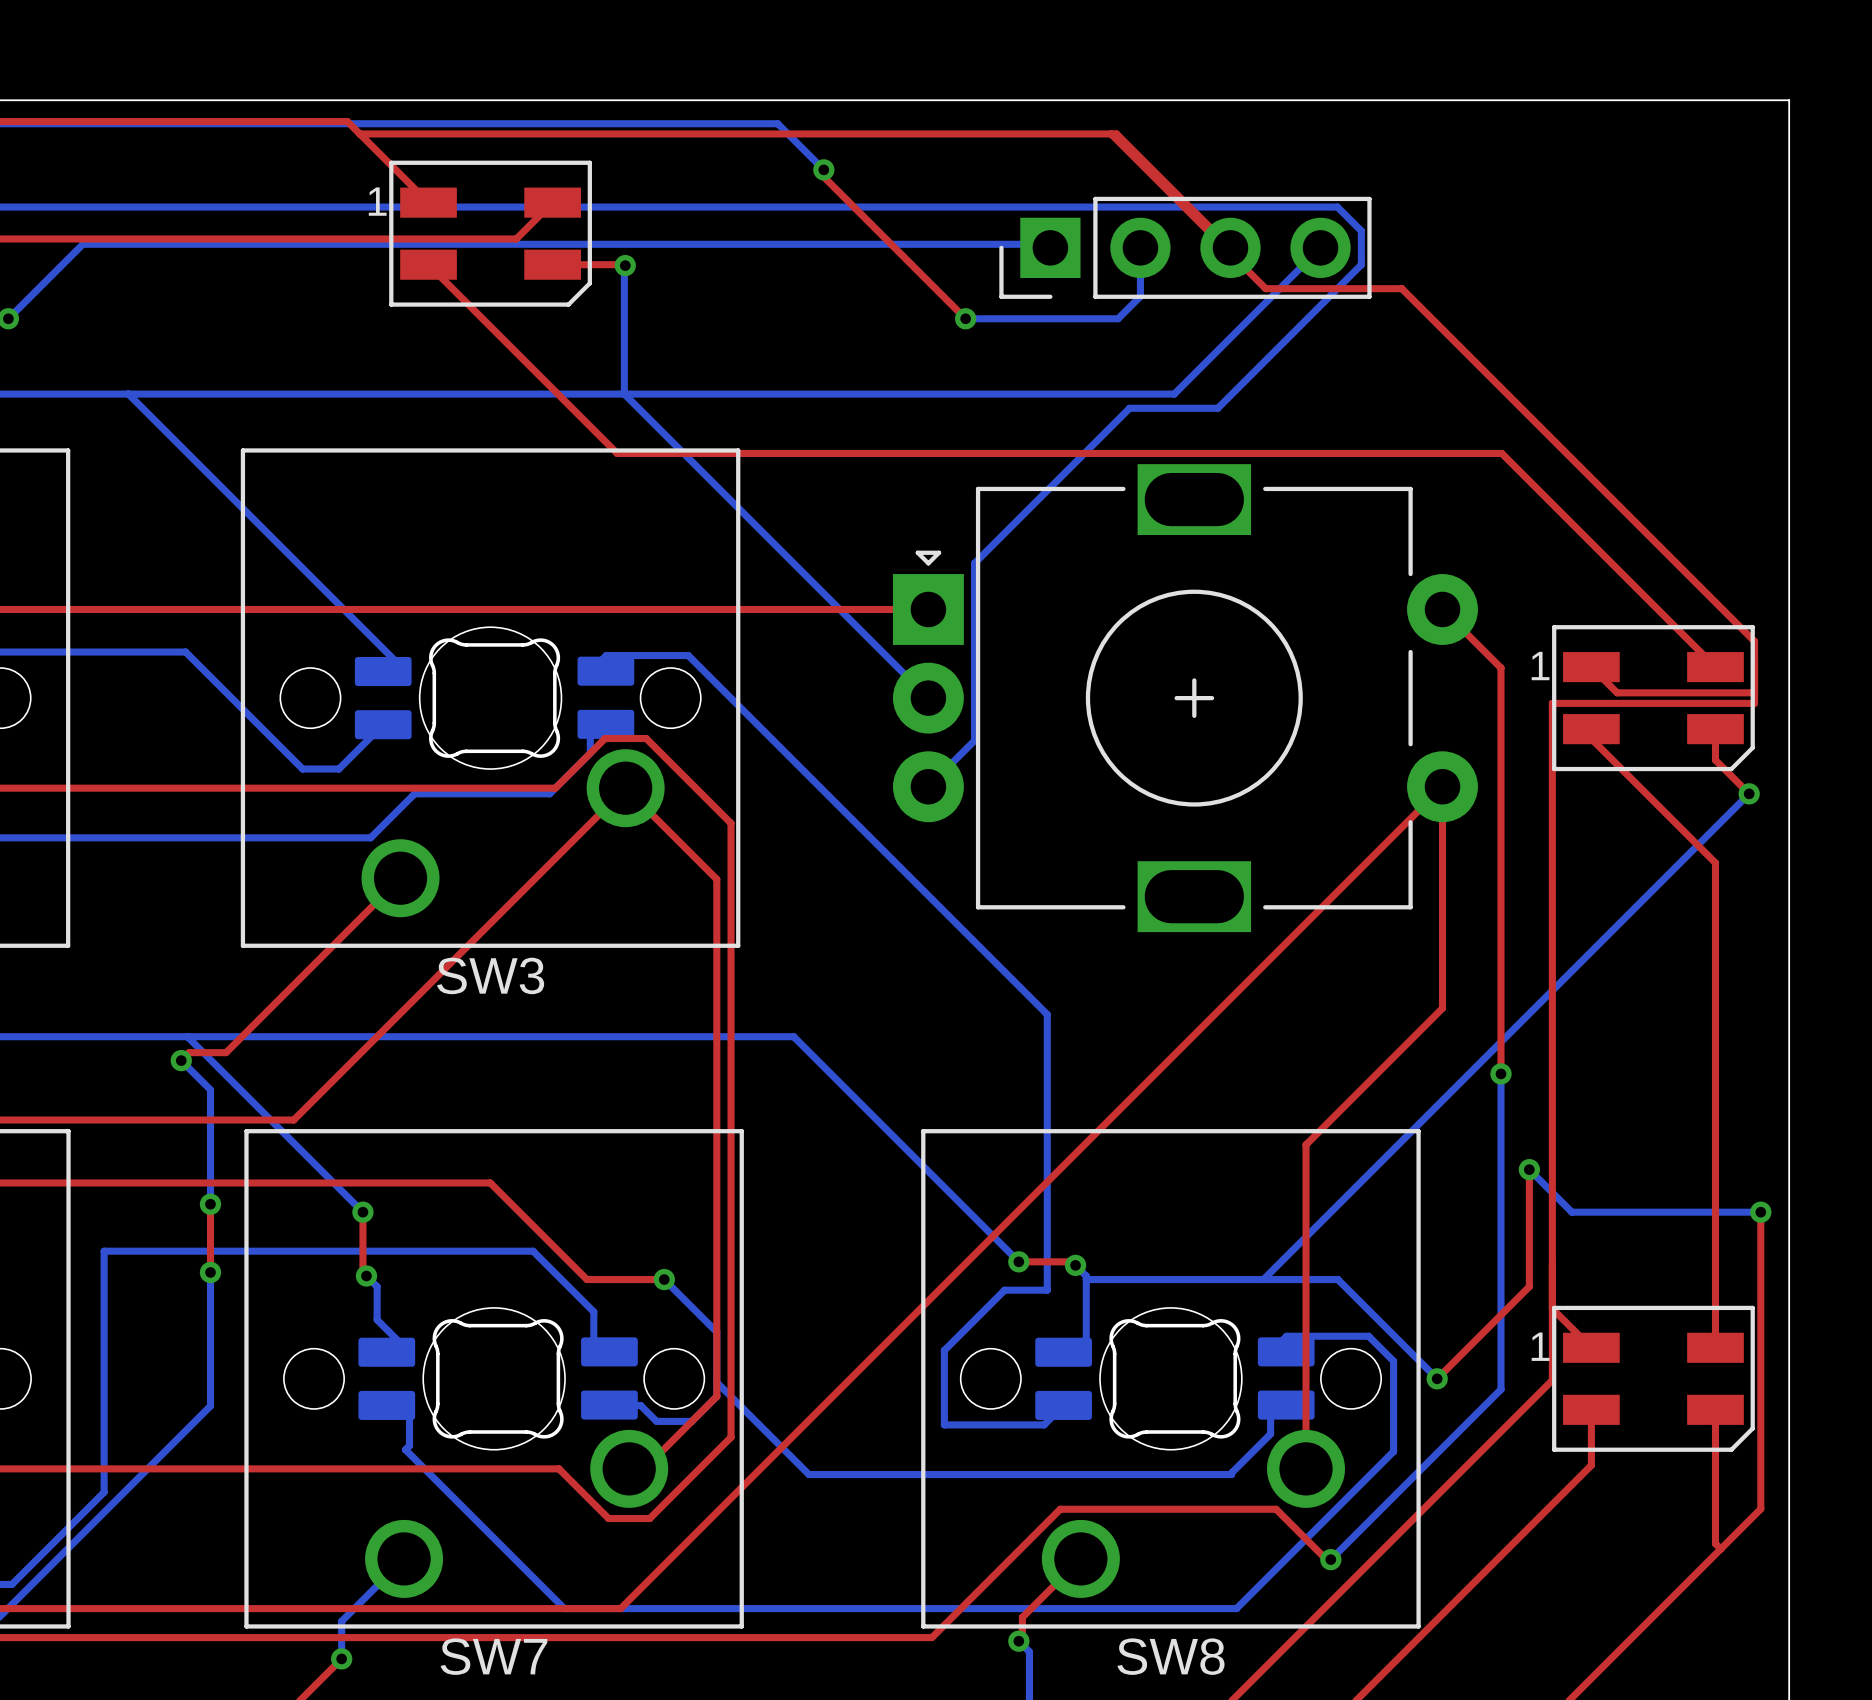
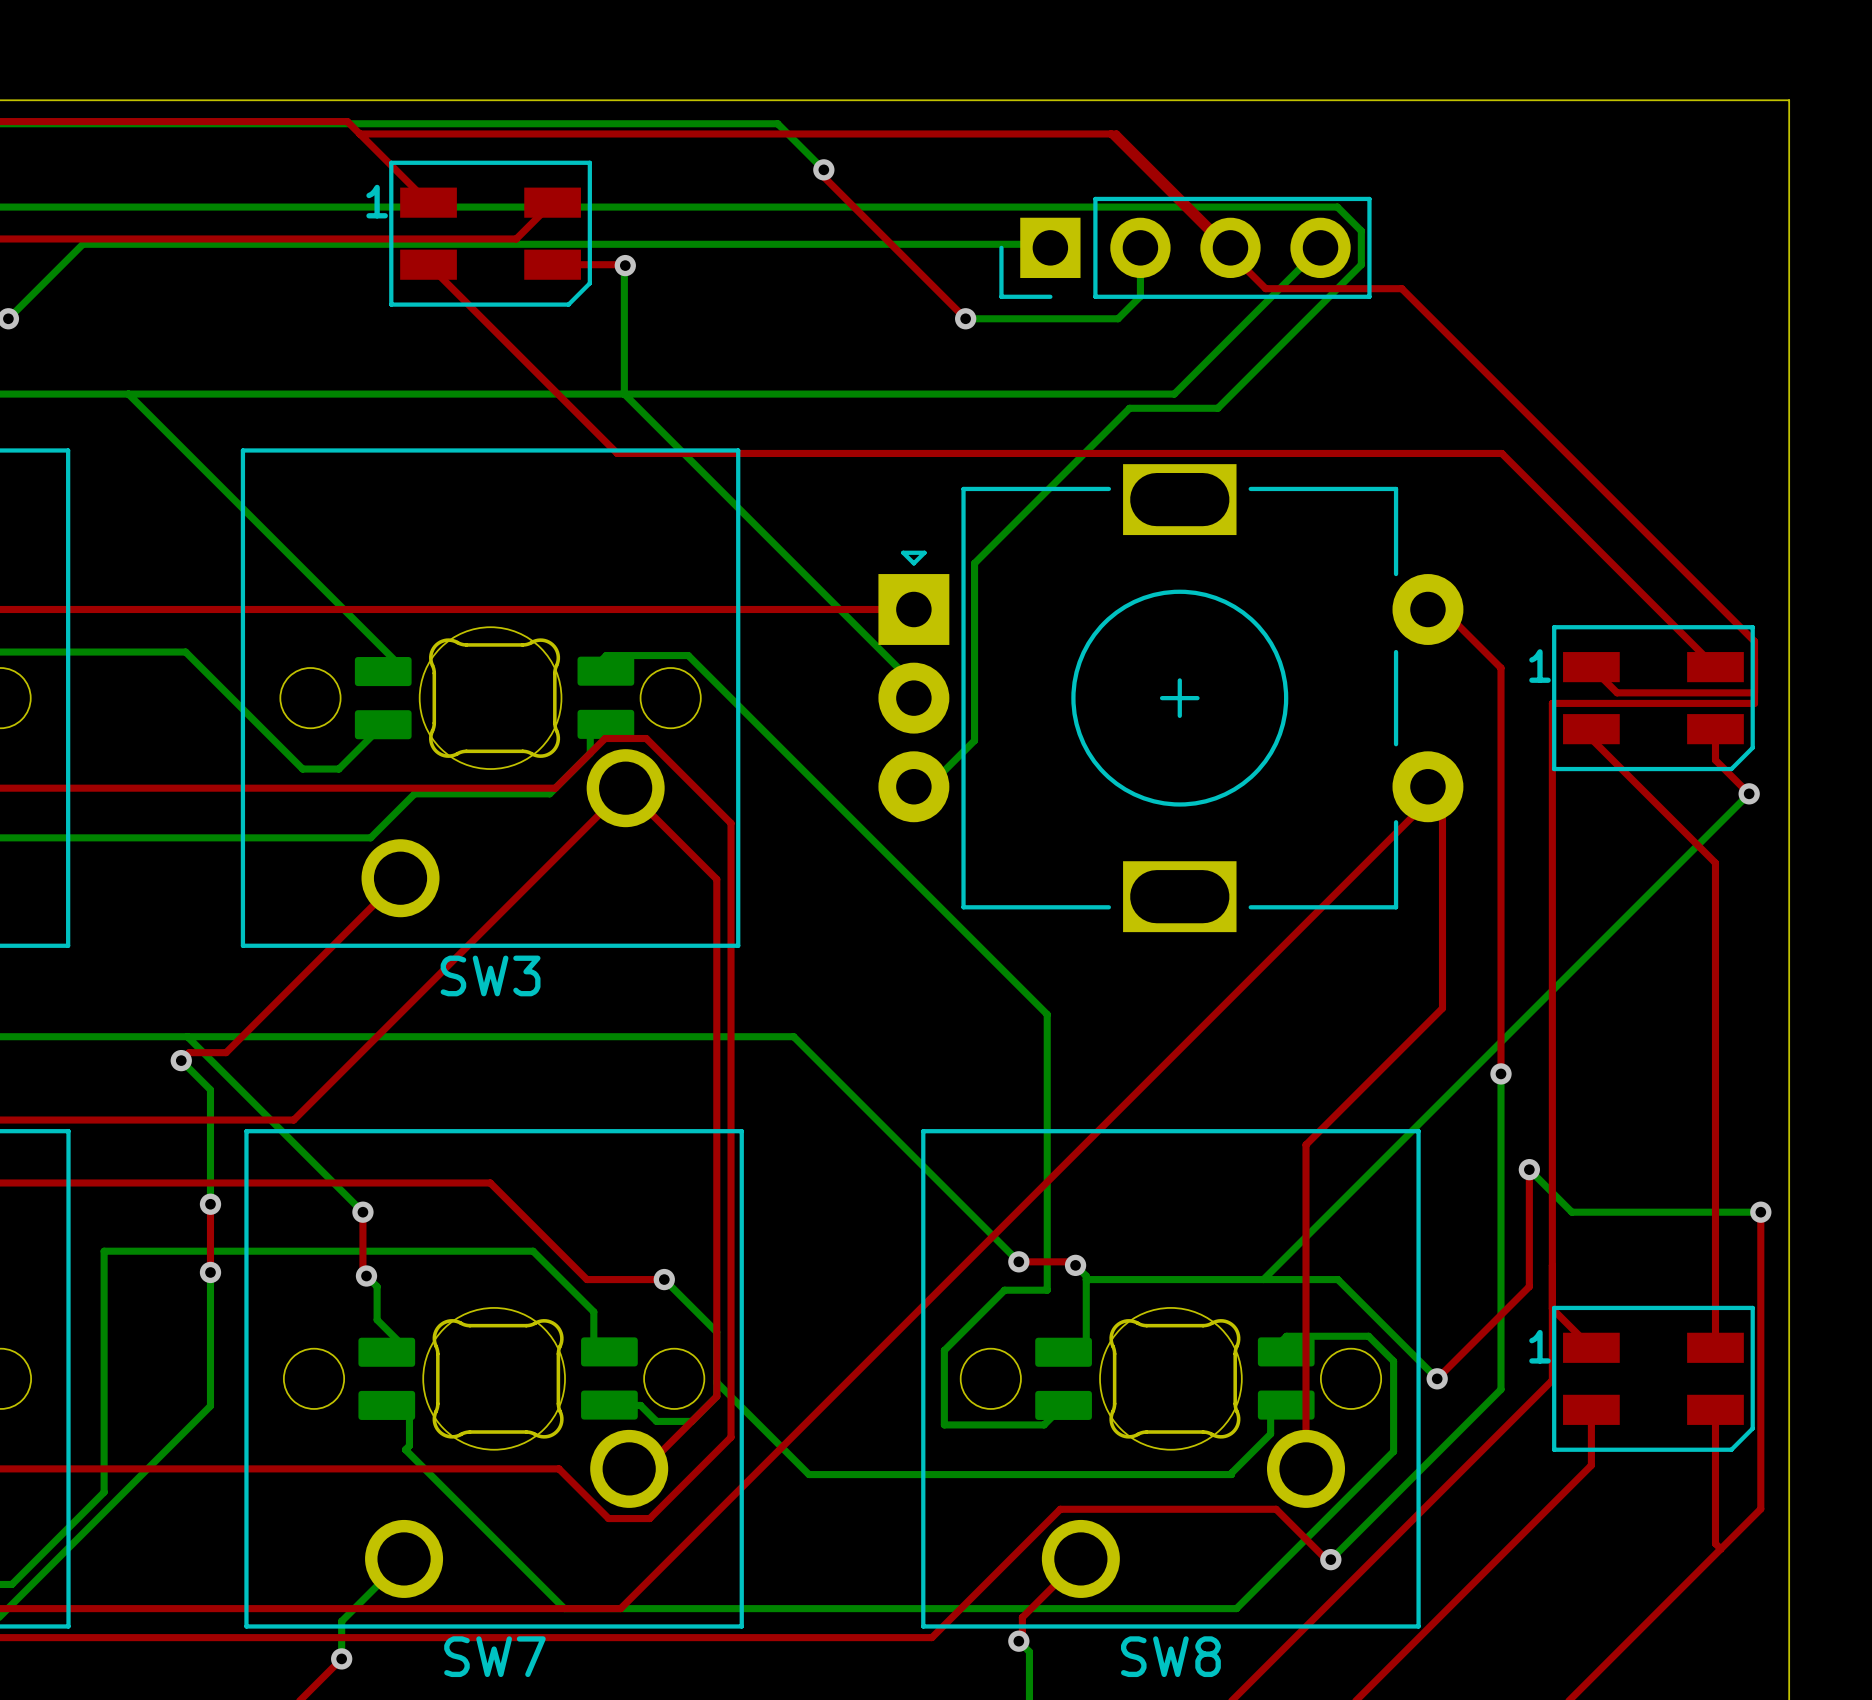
part position: (1185, 698) -> (1170, 698)

